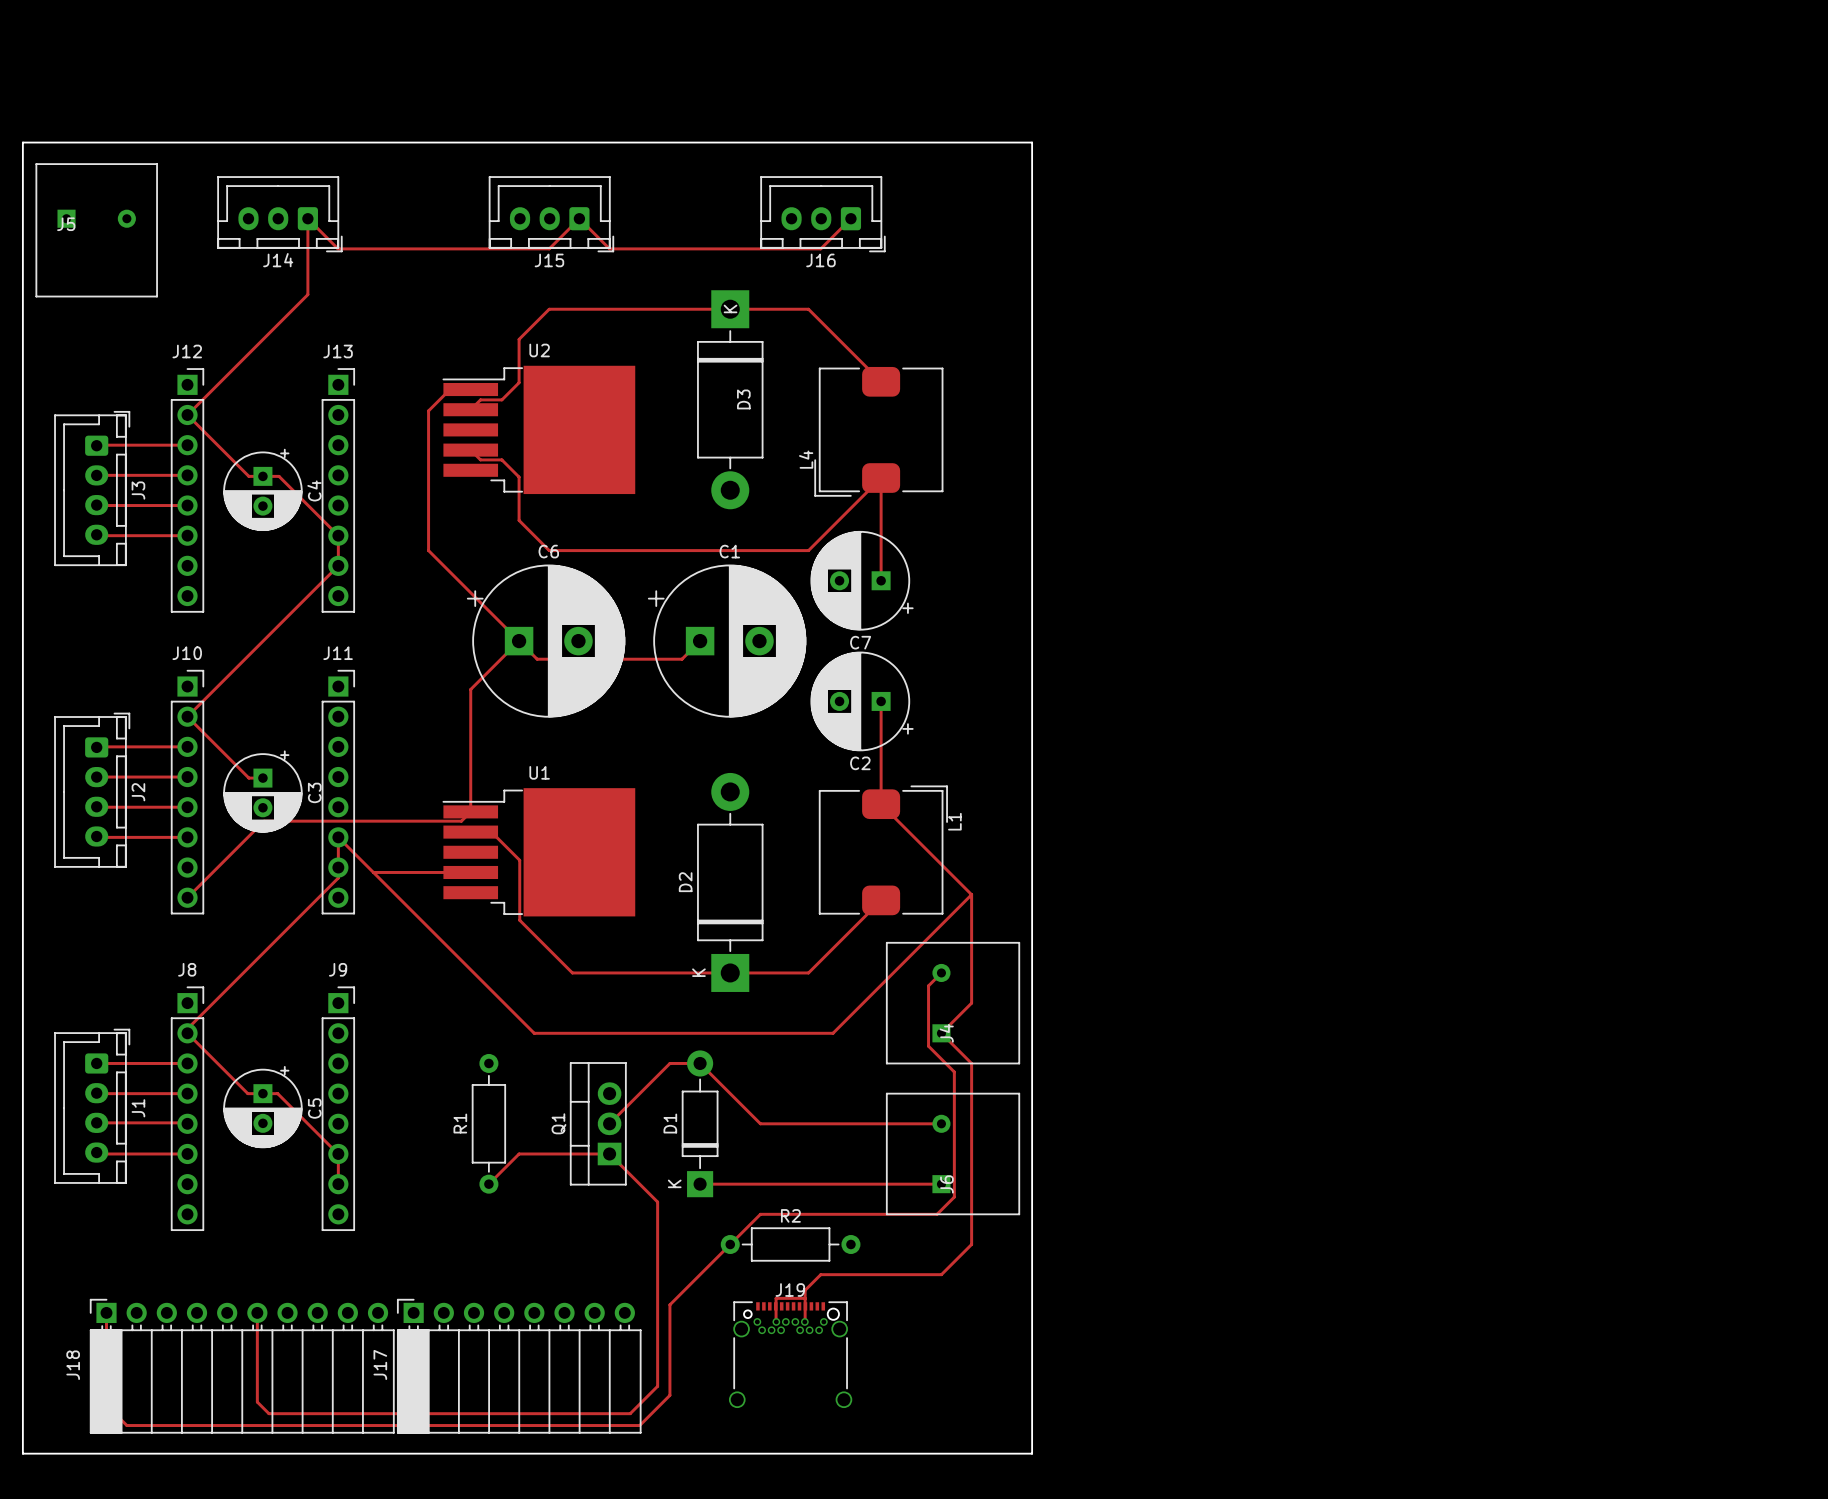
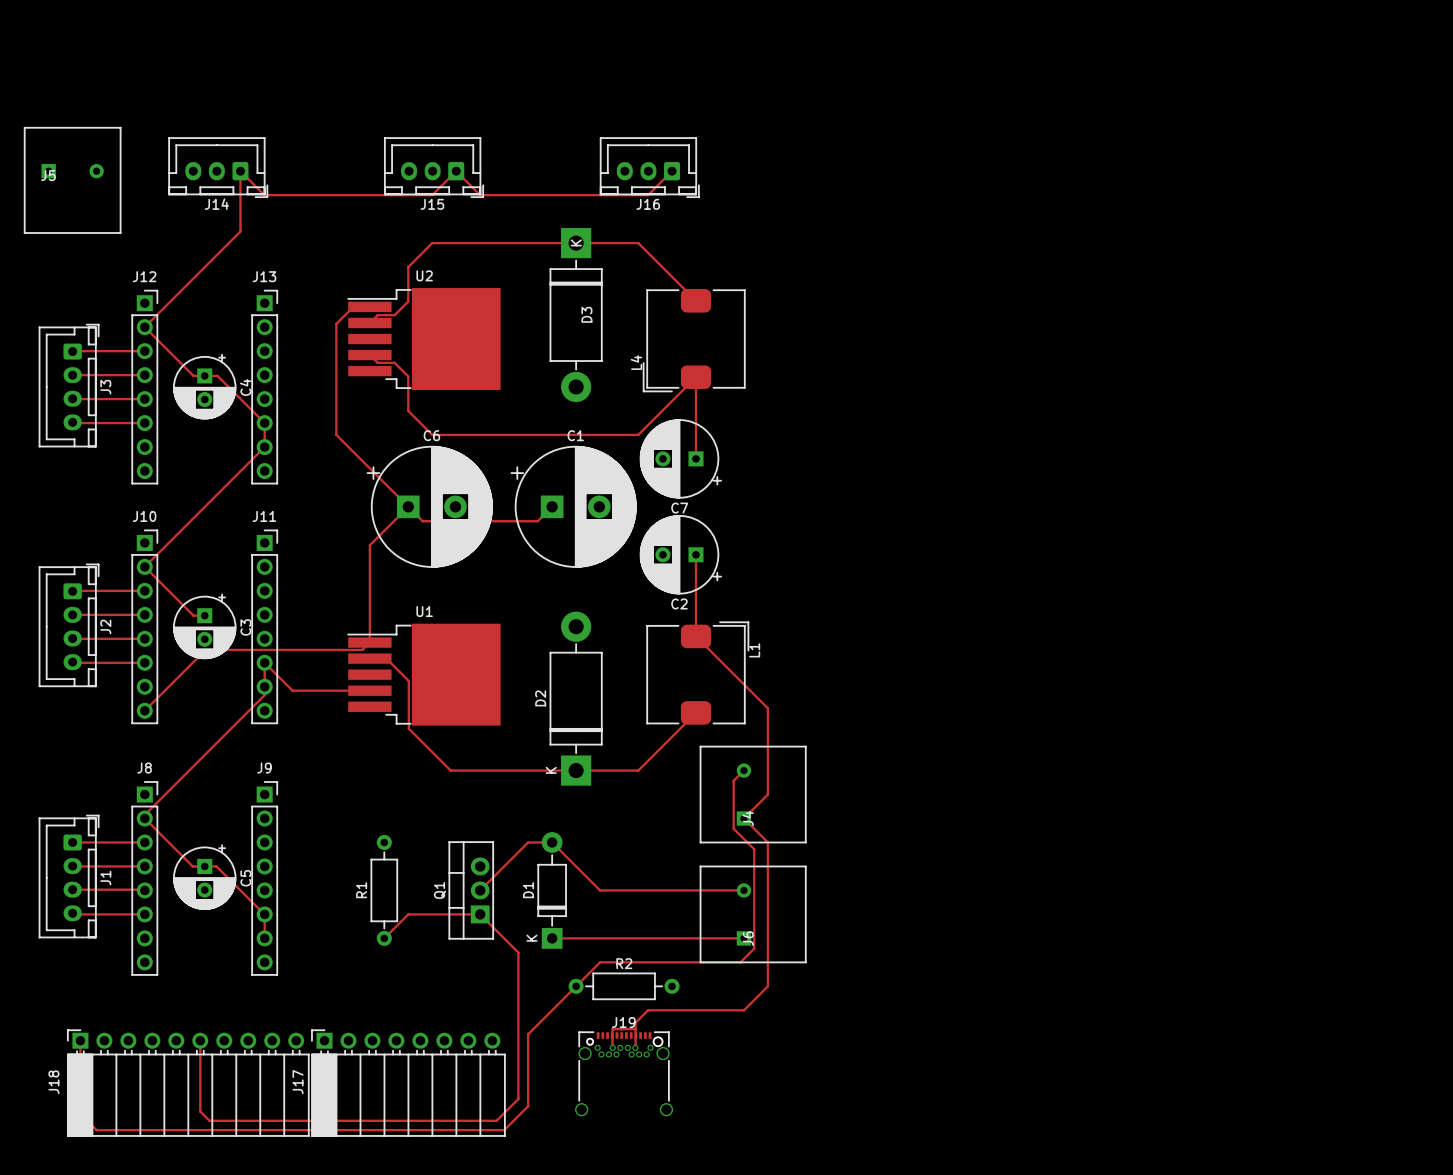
board edge: (22, 142) (1032, 142) (1032, 1453) (22, 1453) (22, 142) -> none
track: (373, 872) (534, 1033) (833, 1033) (971, 894) -> none

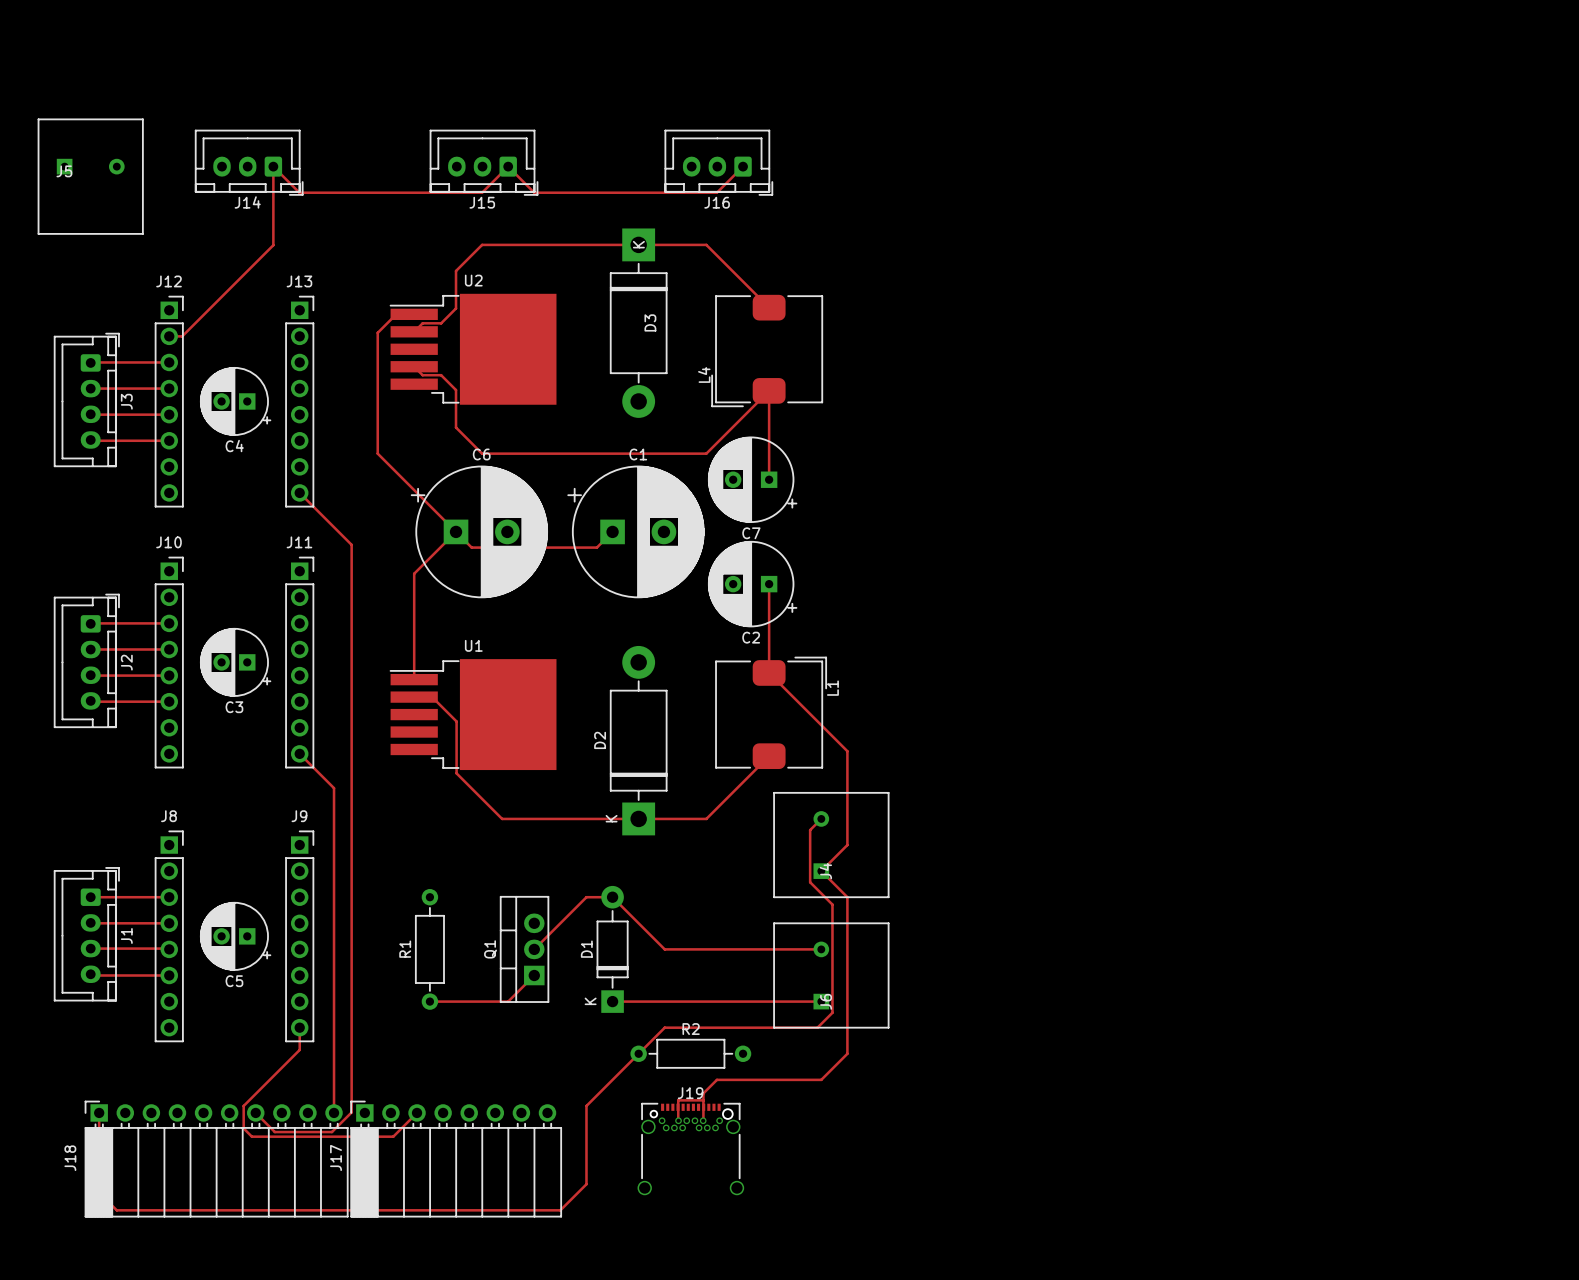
track: (240, 231) (144, 327) (193, 375) (217, 375) (264, 423) (264, 447) (144, 566) (193, 615) (204, 615) -> (273, 232) (273, 245) (182, 336) (169, 336)
C4 rotation: 0° (204, 386) -> 90° clockwise (235, 401)
track: none -> (299, 492) (351, 544) (351, 1112) (331, 1132) (274, 1132) (255, 1112)
C3 rotation: 0° (204, 626) -> 90° clockwise (235, 662)
track: (369, 642) (362, 649) (205, 649) (144, 710) -> none
track: (369, 690) (292, 690) (264, 662) (264, 695) (144, 814) (144, 818) (192, 866) (216, 866) (264, 914) (264, 938) -> none
track: none -> (299, 753) (334, 788) (334, 1112)
C5 rotation: 0° (204, 877) -> 90° clockwise (235, 936)
track: (384, 938) (408, 914) (480, 914) (518, 952) (518, 1099) (496, 1120) (209, 1120) (200, 1111) (200, 1040) -> (429, 1001) (508, 1001) (534, 975)
track: none -> (299, 1027) (299, 1049) (243, 1105) (243, 1128) (251, 1136) (393, 1136) (417, 1112)

